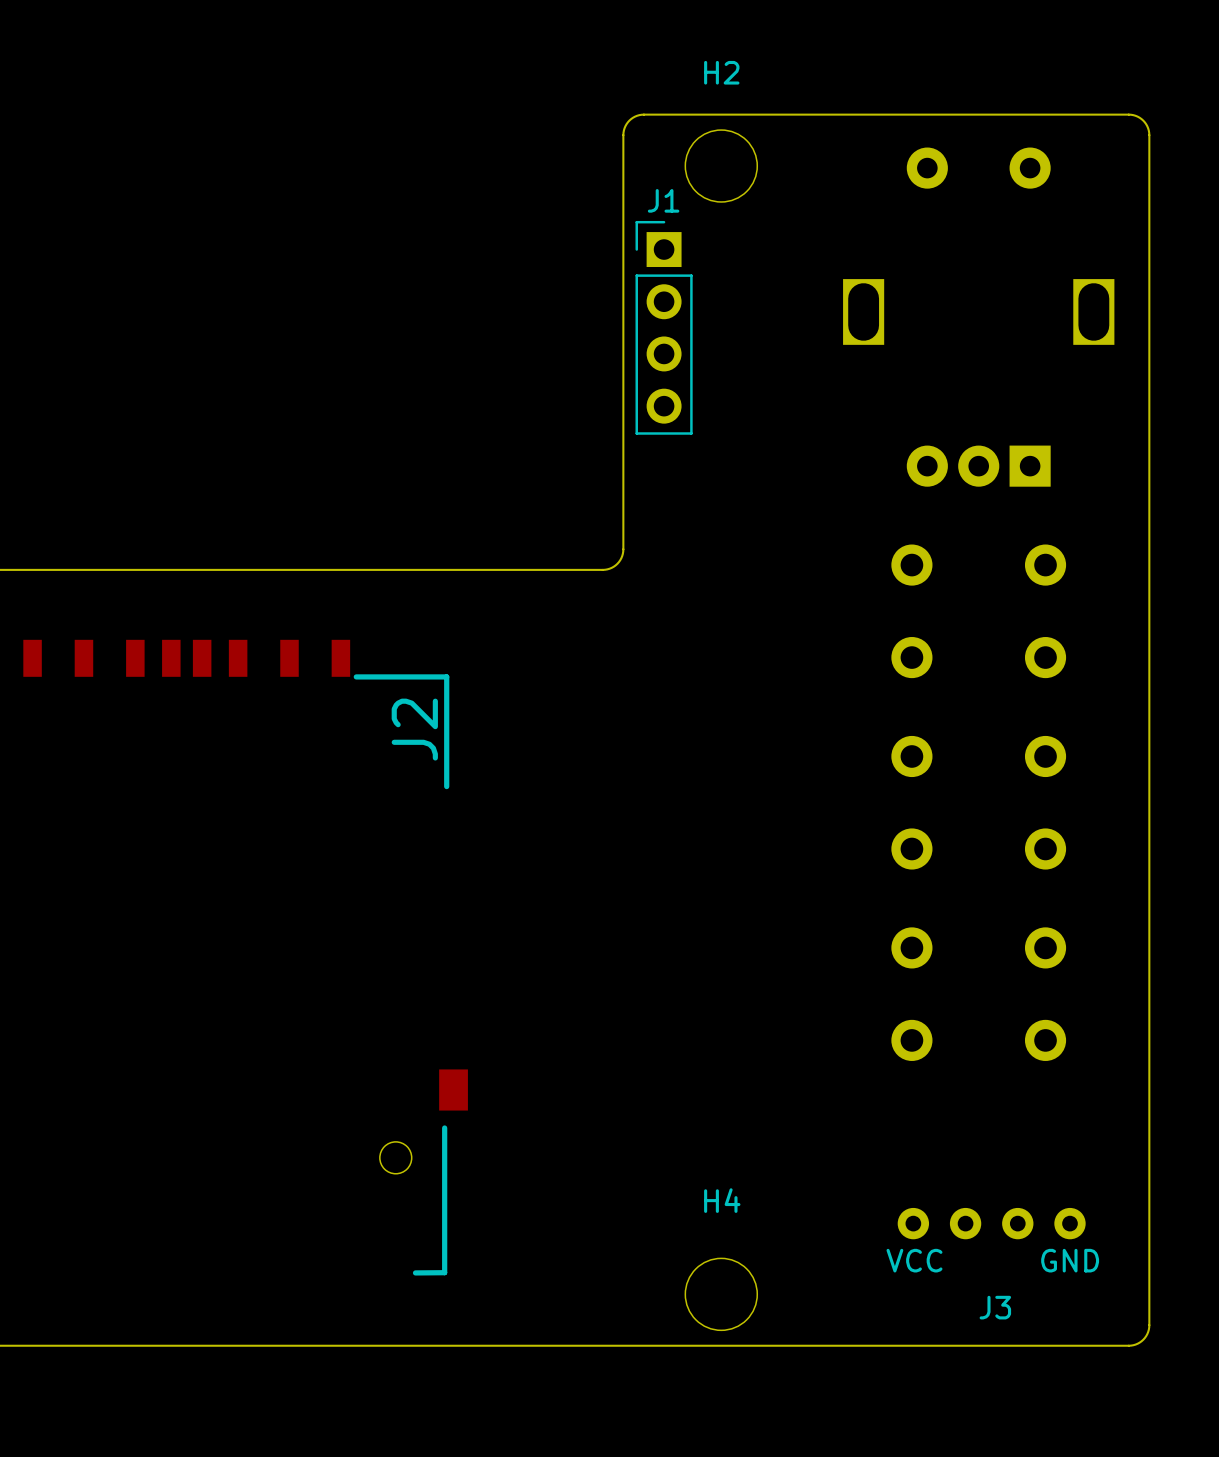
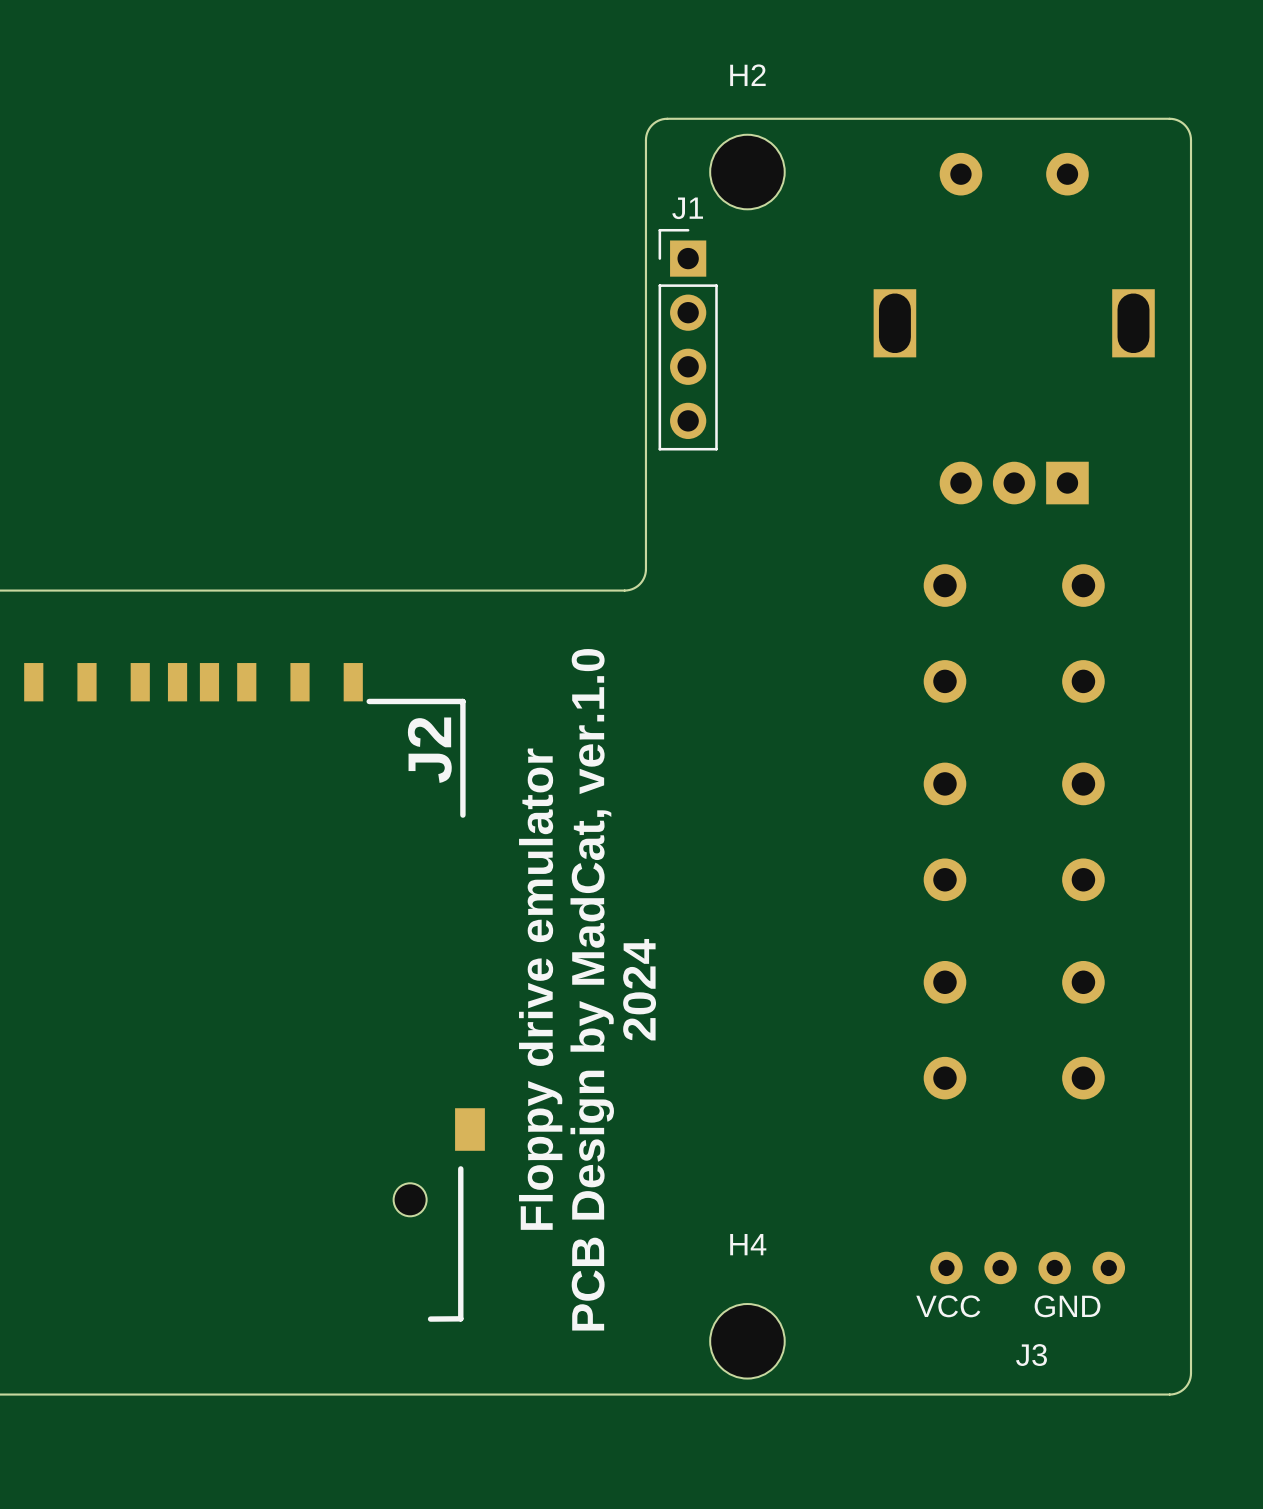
text: none -> Floppy drive emulator (540, 989)
text: none -> PCB Design by MadCat, ver.1.0 (592, 989)
text: none -> 2024 (639, 989)

